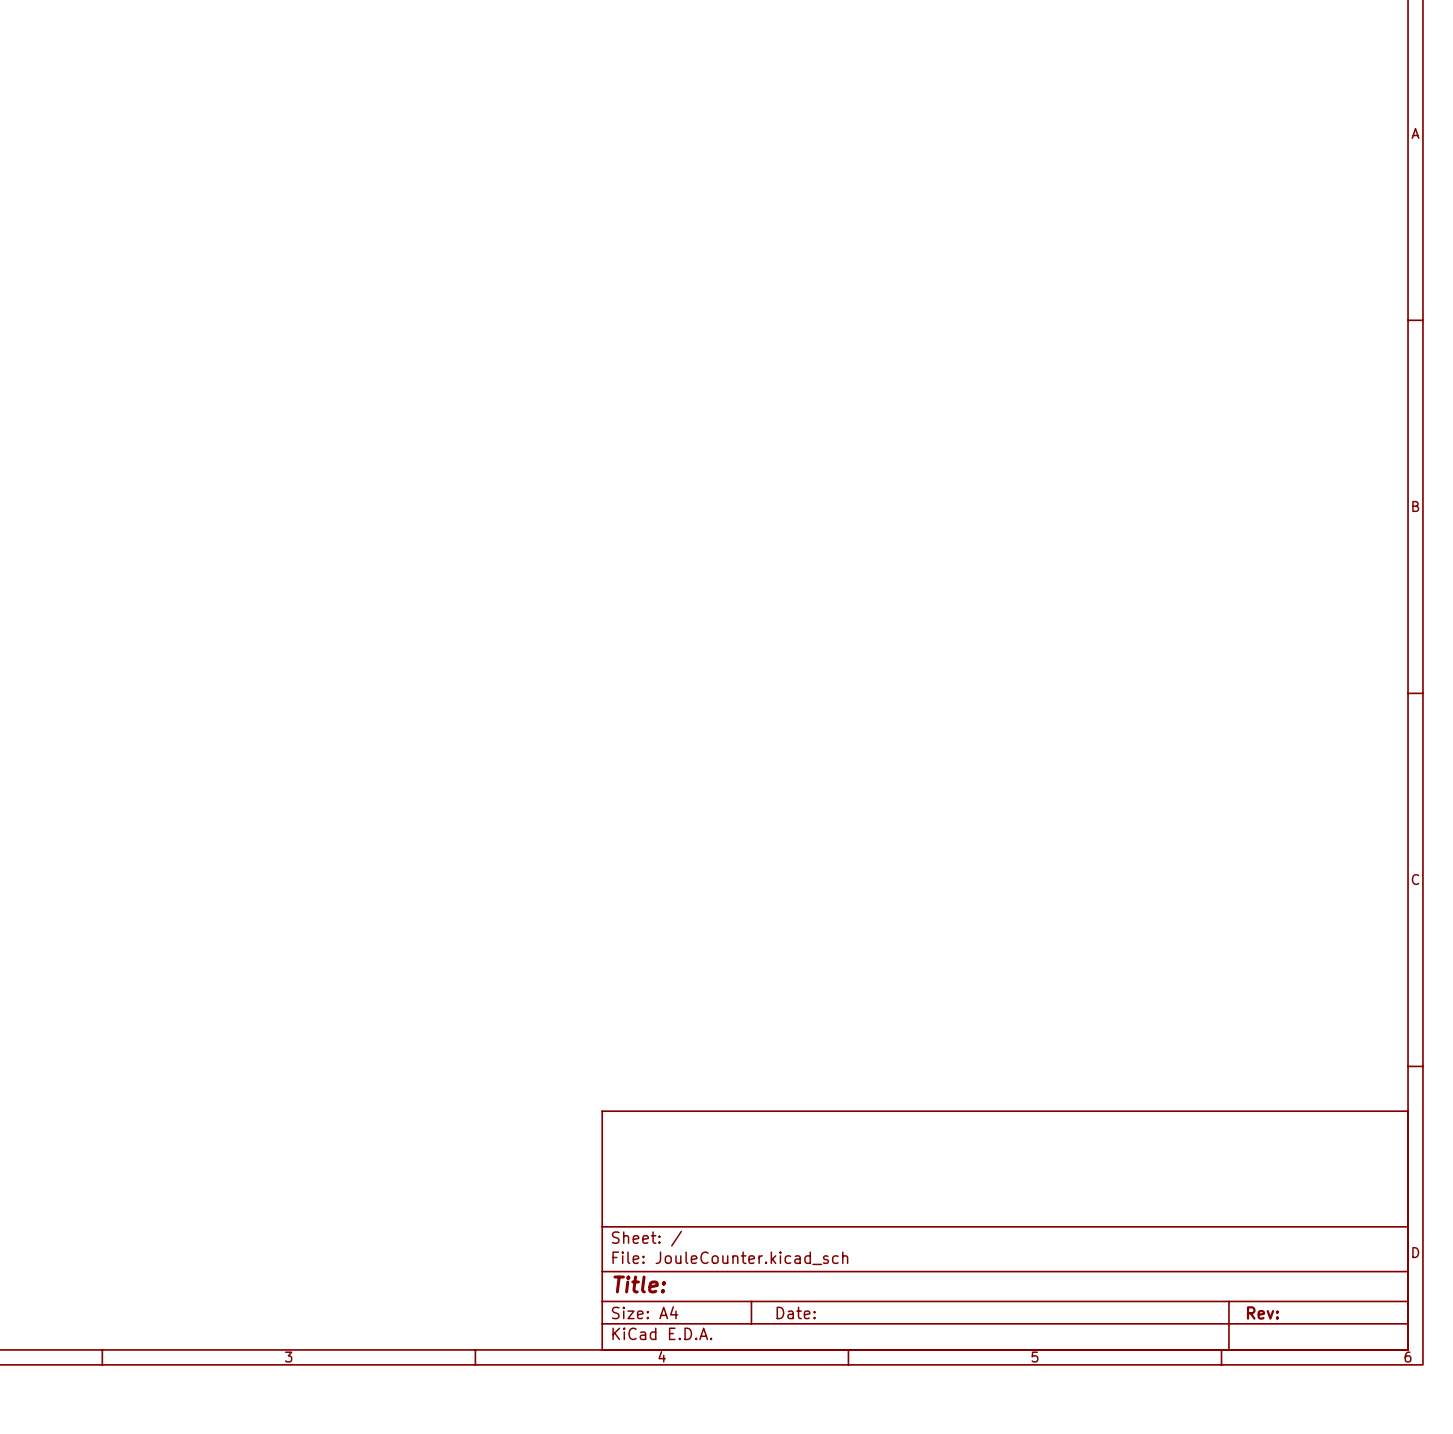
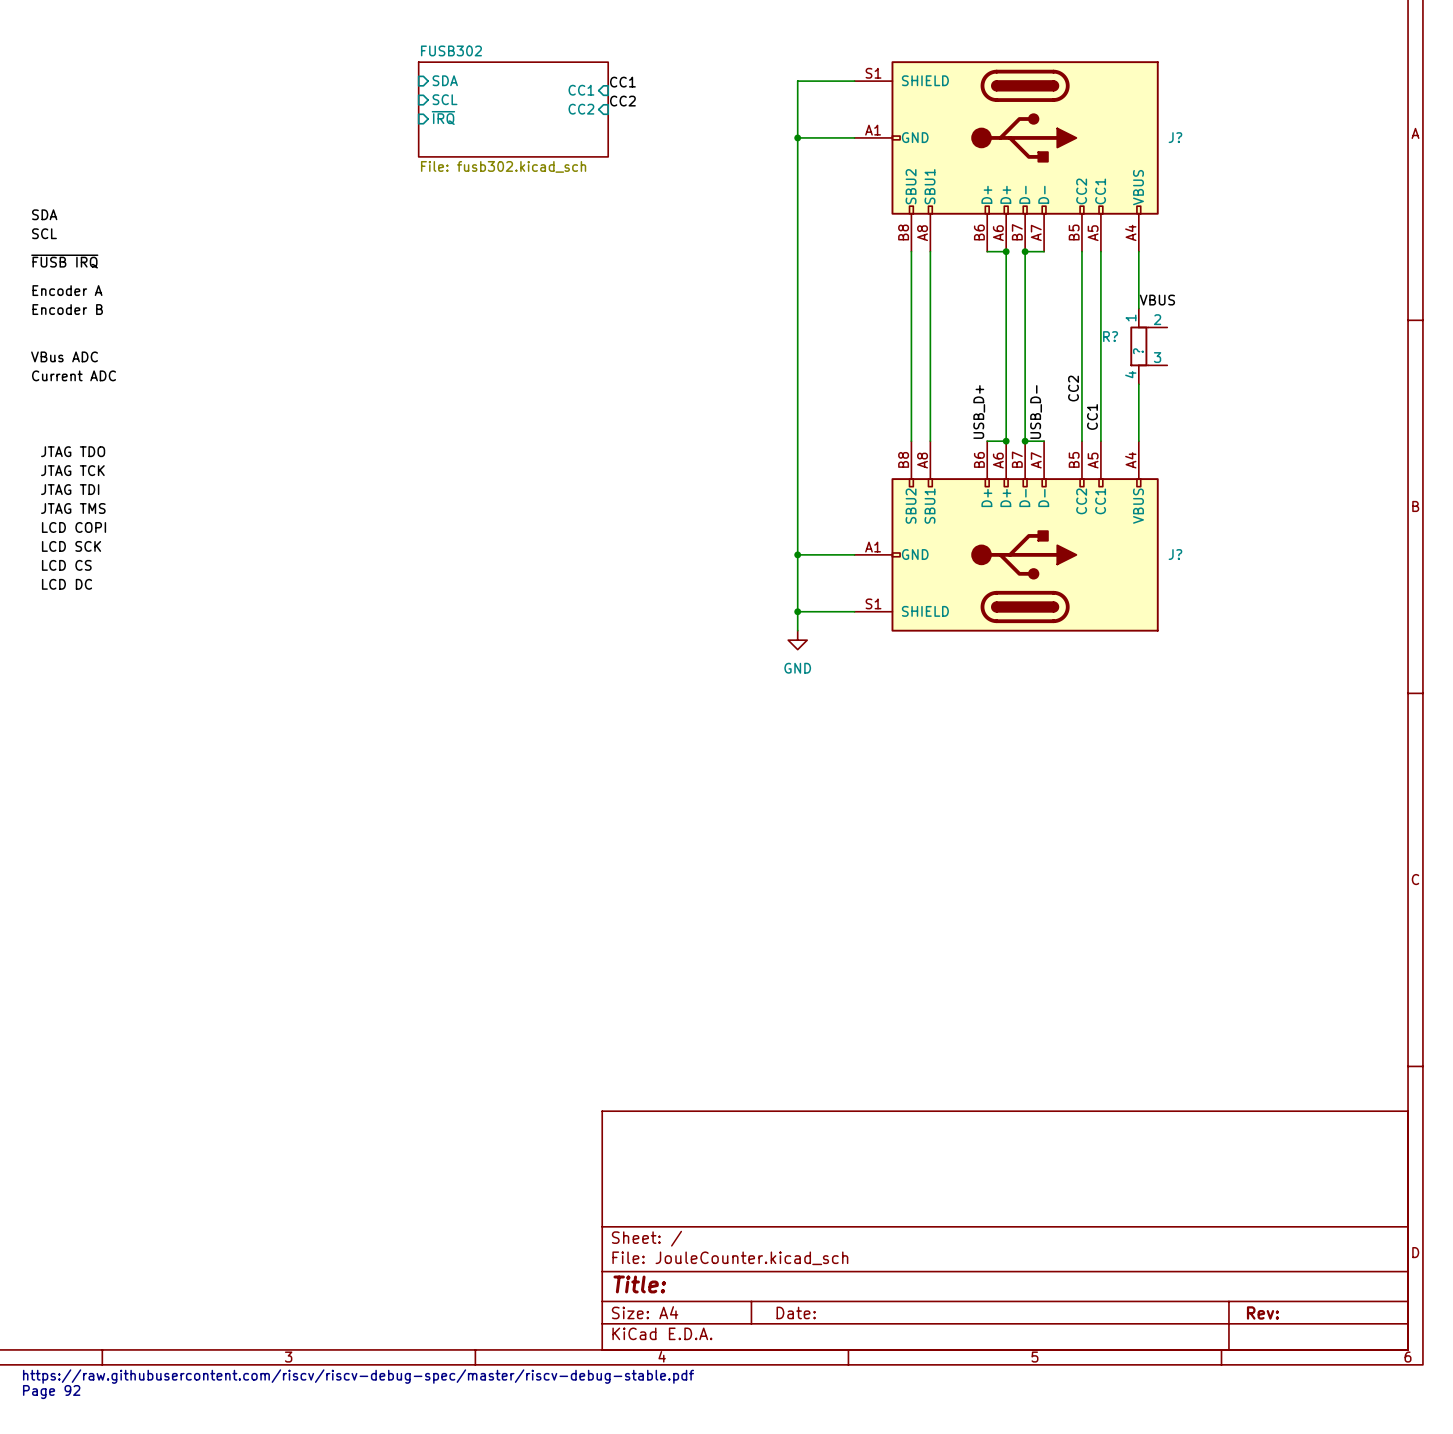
sheet pin: none -> SDA (445, 80)
wire: none -> (854, 81) (797, 81) (797, 630)
label: none -> CC1 (622, 82)
sheet pin: none -> CC1 (581, 90)
sheet pin: none -> SCL (445, 99)
label: none -> CC2 (622, 101)
sheet FUSB302: none -> File: fusb302.kicad_sch (513, 109)
sheet pin: none -> CC2 (581, 109)
sheet pin: none -> ~{IRQ} (443, 118)
wire: none -> (797, 137) (854, 137)
junction: none -> (797, 137)
J?: none -> (1006, 156)
label: none -> SDA (44, 214)
label: none -> SCL (44, 233)
wire: none -> (911, 251) (911, 441)
wire: none -> (930, 251) (930, 441)
wire: none -> (987, 251) (1006, 251) (1006, 441) (987, 441)
junction: none -> (1006, 251)
junction: none -> (1025, 251)
wire: none -> (1044, 251) (1025, 251) (1025, 441) (1044, 441)
wire: none -> (1081, 251) (1081, 441)
wire: none -> (1100, 251) (1100, 441)
wire: none -> (1138, 251) (1138, 308)
label: none -> ~{FUSB IRQ} (64, 261)
label: none -> Encoder A (67, 290)
label: none -> VBUS (1157, 300)
label: none -> Encoder B (67, 309)
R?: none -> ? (1148, 346)
label: none -> VBus ADC (64, 356)
label: none -> Current ADC (74, 375)
wire: none -> (1138, 384) (1138, 441)
label: none -> CC2 (1073, 388)
label: none -> USB_D+ (979, 412)
label: none -> USB_D- (1036, 412)
label: none -> CC1 (1092, 416)
junction: none -> (1006, 441)
junction: none -> (1025, 441)
label: none -> JTAG TDO (73, 451)
label: none -> JTAG TCK (72, 470)
label: none -> JTAG TDI (70, 489)
label: none -> JTAG TMS (73, 508)
label: none -> LCD COPI (74, 527)
J?: none -> (1006, 536)
label: none -> LCD SCK (71, 546)
wire: none -> (797, 554) (854, 554)
junction: none -> (797, 554)
label: none -> LCD CS (66, 565)
label: none -> LCD DC (67, 584)
wire: none -> (797, 611) (854, 611)
junction: none -> (797, 611)
power symbol: none -> GND (797, 640)
text: none -> https://raw.githubusercontent.com/riscv/riscv-debug-spec/master/riscv-debug-stable.pdf (358, 1376)
text: none -> Page 92 (51, 1392)

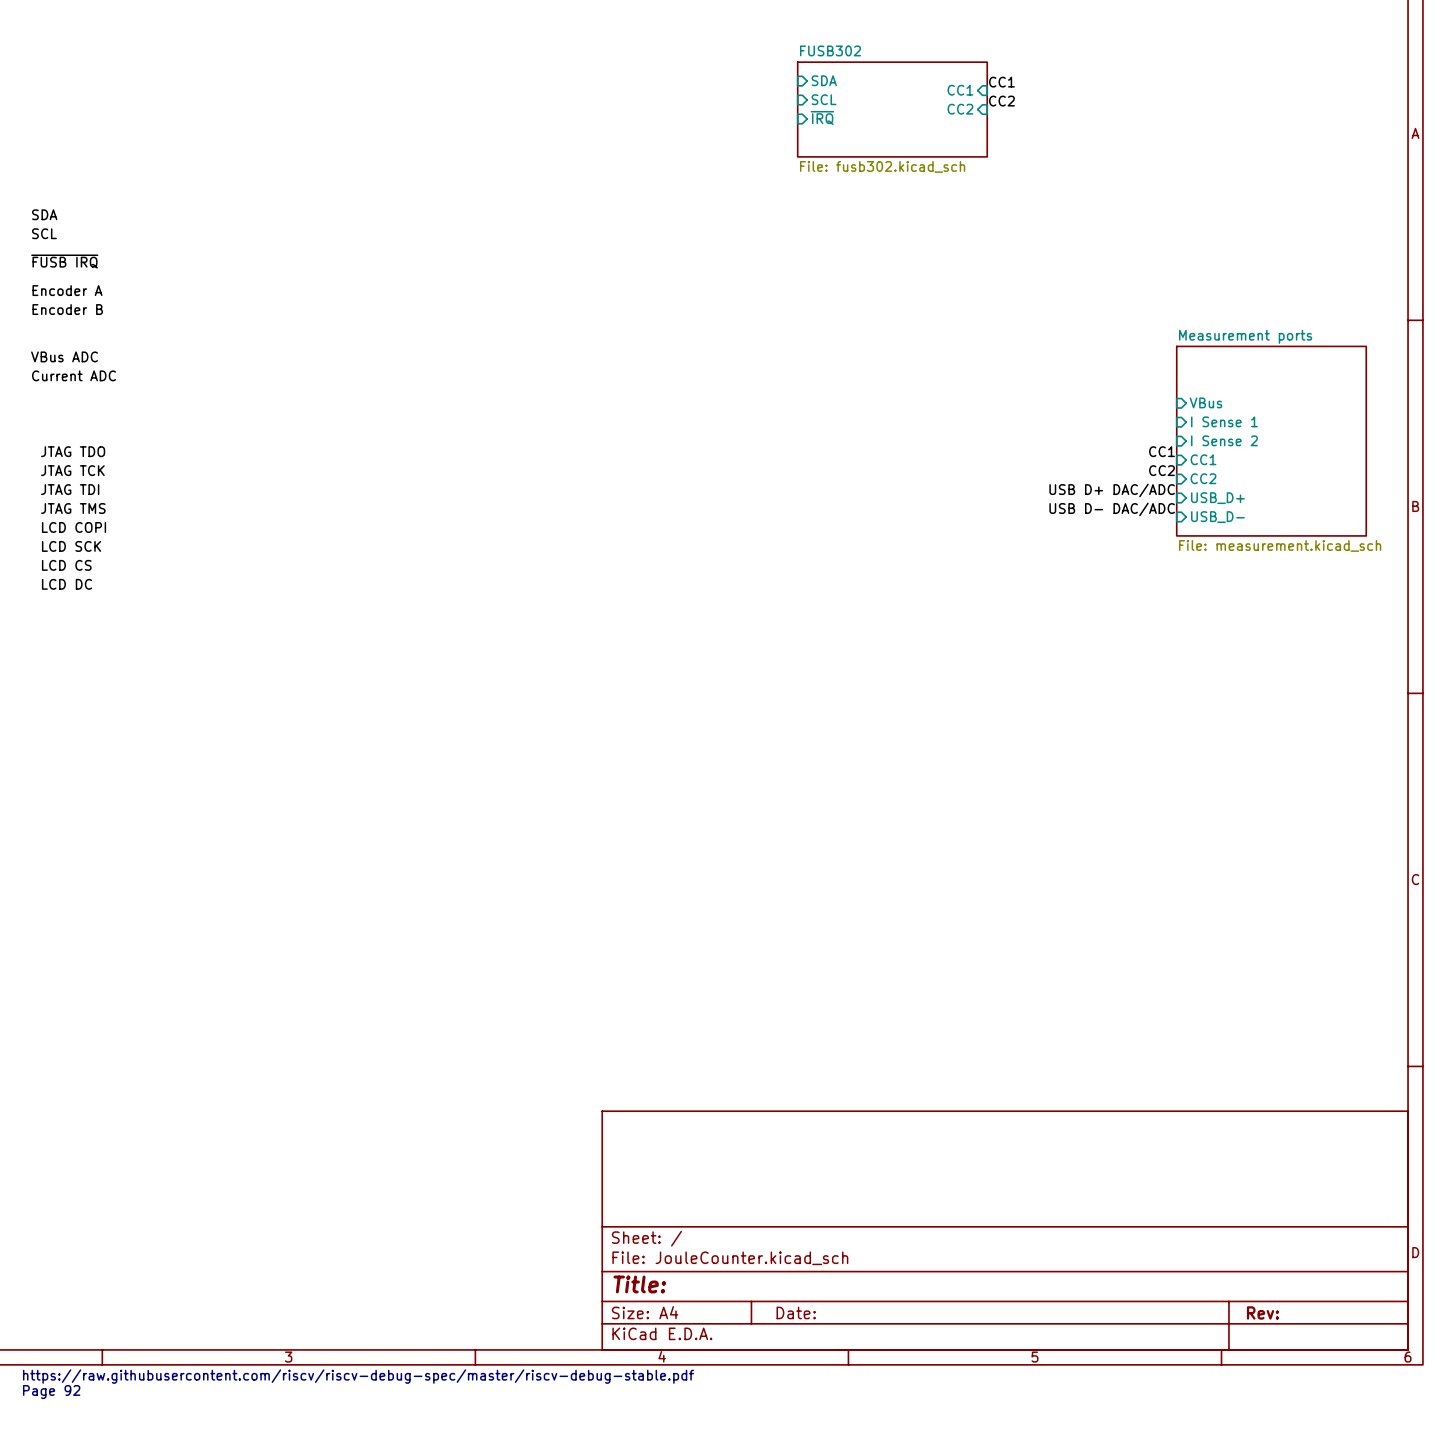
sheet pin: SDA (445, 80) -> none
sheet pin: none -> SDA (824, 80)
wire: (854, 81) (797, 81) (797, 630) -> none
label: CC1 (622, 82) -> none
label: none -> CC1 (1001, 82)
sheet pin: CC1 (581, 90) -> none
sheet pin: none -> CC1 (960, 90)
sheet pin: SCL (445, 99) -> none
sheet pin: none -> SCL (824, 99)
label: CC2 (622, 101) -> none
label: none -> CC2 (1001, 101)
sheet FUSB302 position: (513, 109) -> (892, 109)
sheet pin: CC2 (581, 109) -> none
sheet pin: none -> CC2 (960, 109)
sheet pin: ~{IRQ} (443, 118) -> none
sheet pin: none -> ~{IRQ} (822, 118)
wire: (797, 137) (854, 137) -> none
junction: (797, 137) -> none
J?: (1006, 156) -> none
wire: (911, 251) (911, 441) -> none
wire: (930, 251) (930, 441) -> none
wire: (987, 251) (1006, 251) (1006, 441) (987, 441) -> none
junction: (1006, 251) -> none
junction: (1025, 251) -> none
wire: (1044, 251) (1025, 251) (1025, 441) (1044, 441) -> none
wire: (1081, 251) (1081, 441) -> none
wire: (1100, 251) (1100, 441) -> none
wire: (1138, 251) (1138, 308) -> none
label: VBUS (1157, 300) -> none
R?: ? (1148, 346) -> none
wire: (1138, 384) (1138, 441) -> none
label rotation: 0° (1073, 388) -> 90° clockwise (1161, 470)
label position: CC2 (1073, 388) -> CC2 (1161, 470)
sheet pin: none -> VBus (1205, 402)
label: USB_D+ (979, 412) -> none
label: USB_D- (1036, 412) -> none
label rotation: 0° (1092, 416) -> 90° clockwise (1161, 451)
label position: CC1 (1092, 416) -> CC1 (1161, 451)
sheet pin: none -> I Sense 1 (1224, 421)
sheet pin: none -> I Sense 2 (1224, 440)
junction: (1006, 441) -> none
junction: (1025, 441) -> none
sheet Measurement ports: none -> File: measurement.kicad_sch (1271, 441)
sheet pin: none -> CC1 (1203, 459)
sheet pin: none -> CC2 (1203, 478)
label: none -> USB D+ DAC/ADC (1112, 490)
sheet pin: none -> USB_D+ (1217, 498)
label: none -> USB D- DAC/ADC (1112, 509)
sheet pin: none -> USB_D- (1217, 517)
J?: (1006, 536) -> none
wire: (797, 554) (854, 554) -> none
junction: (797, 554) -> none
wire: (797, 611) (854, 611) -> none
junction: (797, 611) -> none
power symbol: GND (797, 640) -> none

